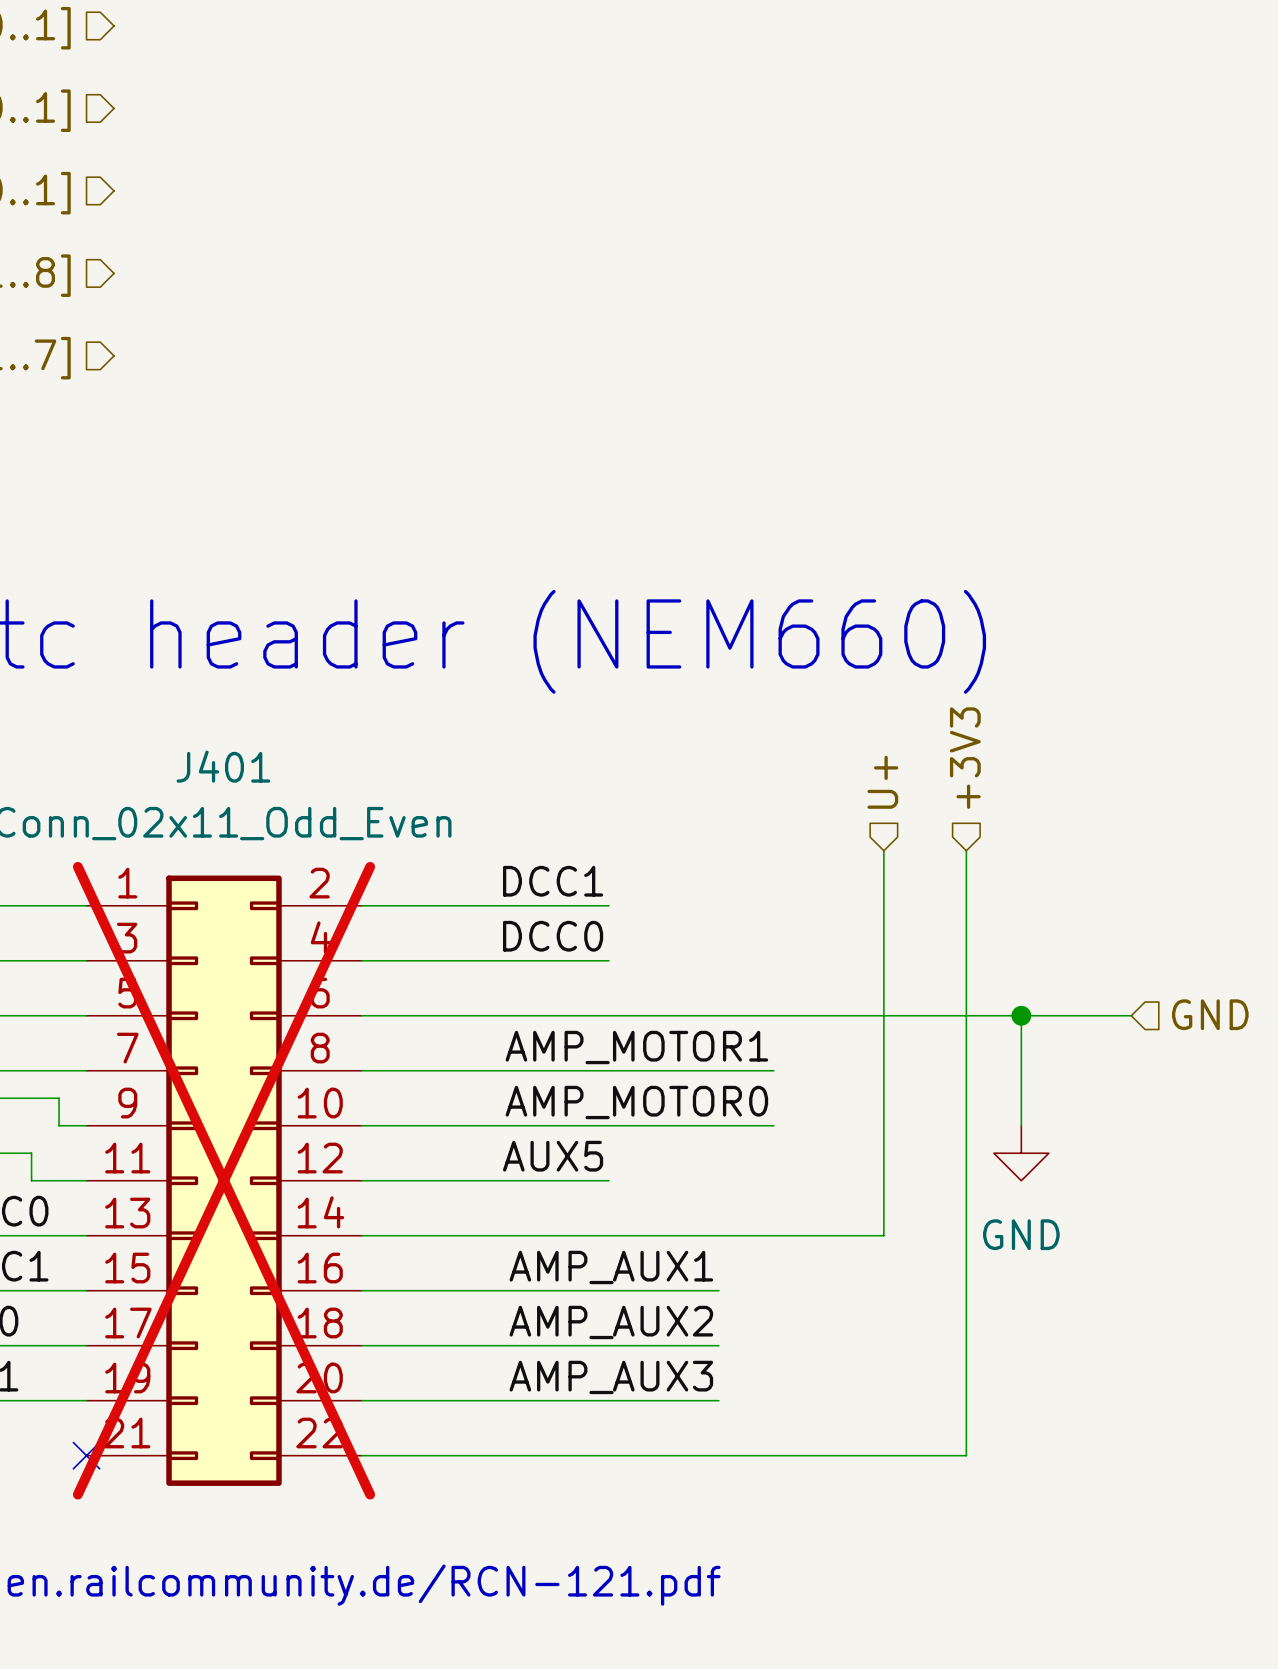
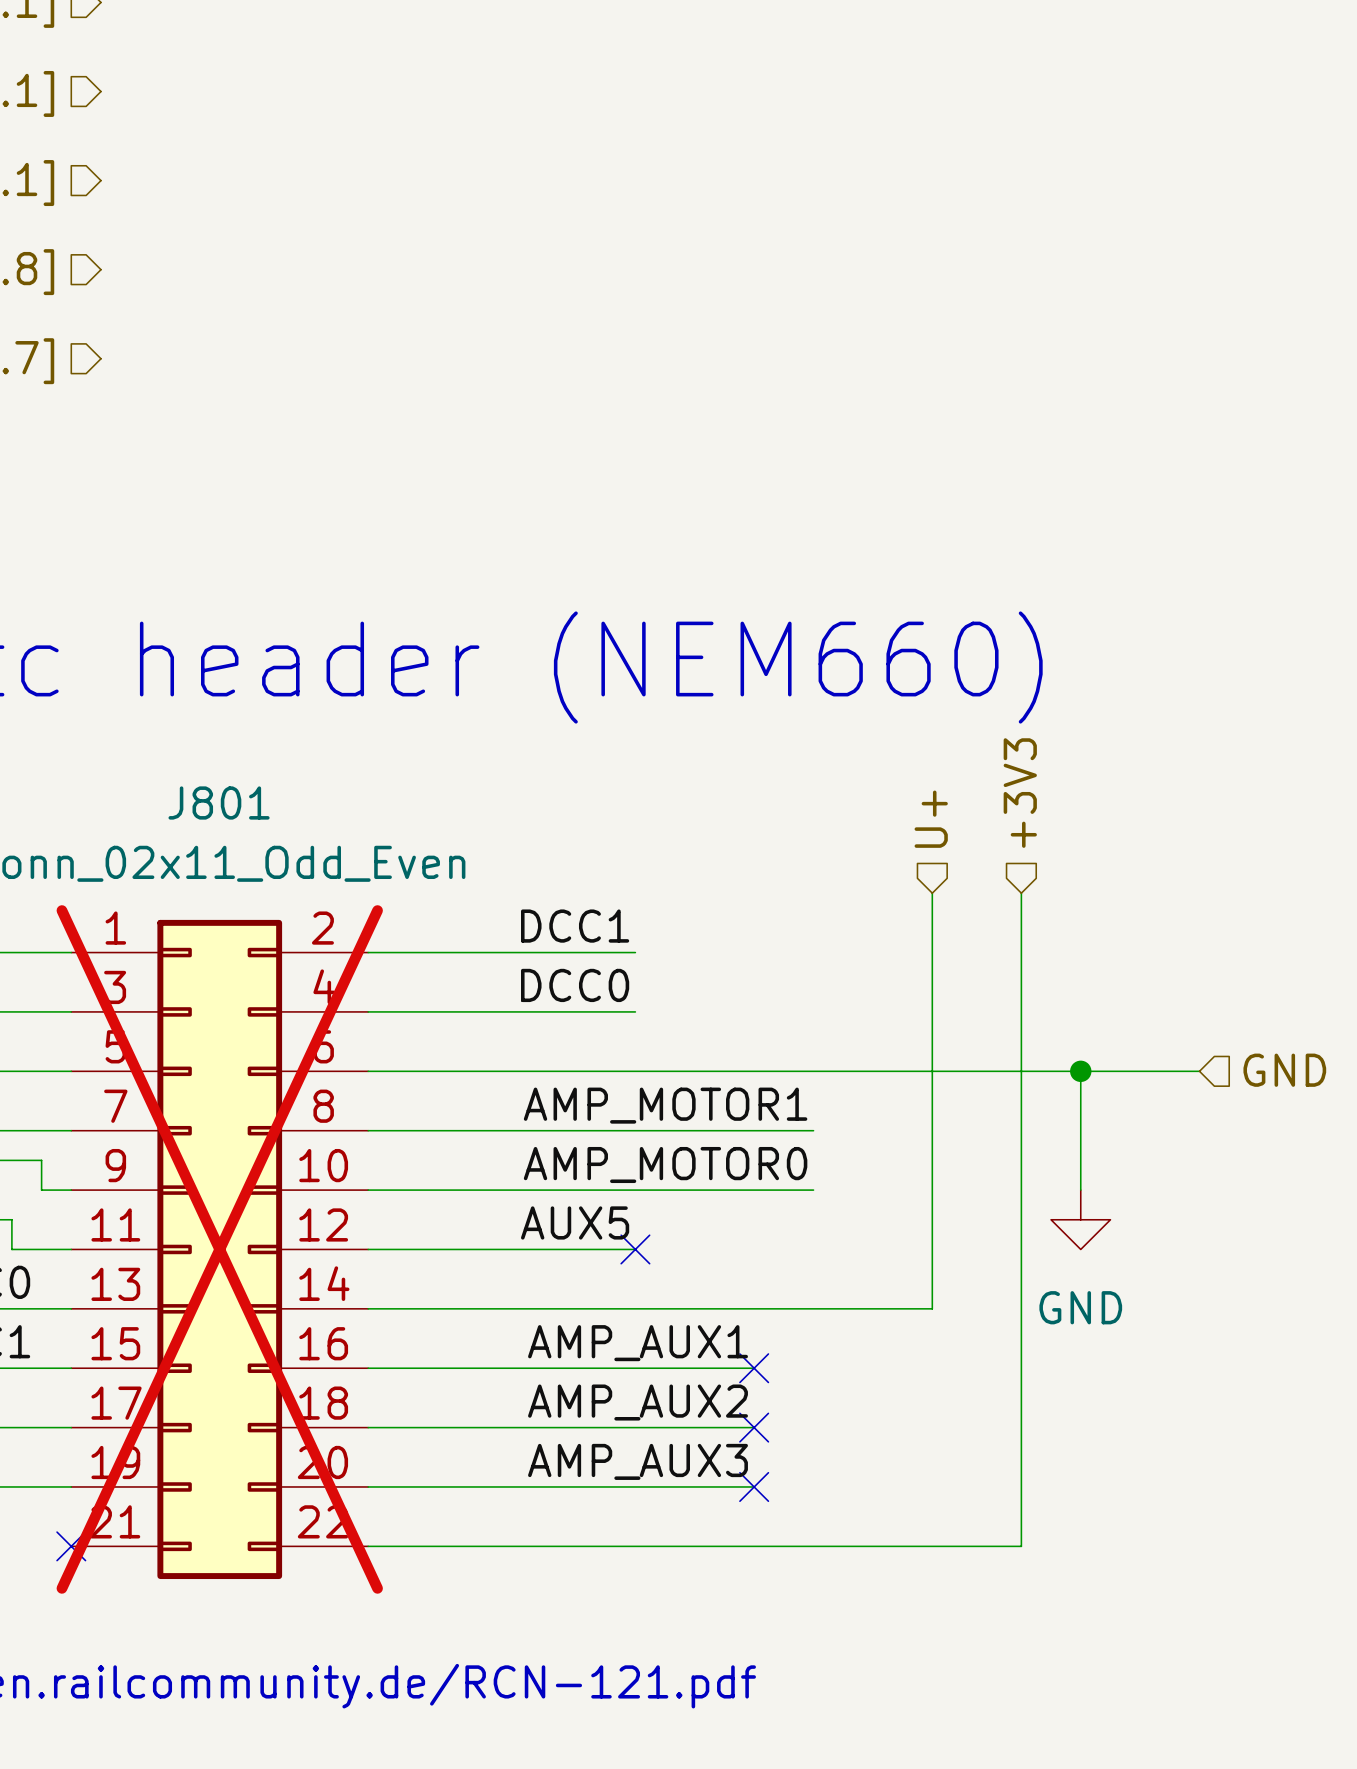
J401 name: J401 (223, 766) -> J801 (219, 803)
no-connect mark: none -> (635, 1249)
no-connect mark: none -> (754, 1368)
no-connect mark: none -> (754, 1427)
no-connect mark: none -> (754, 1486)

